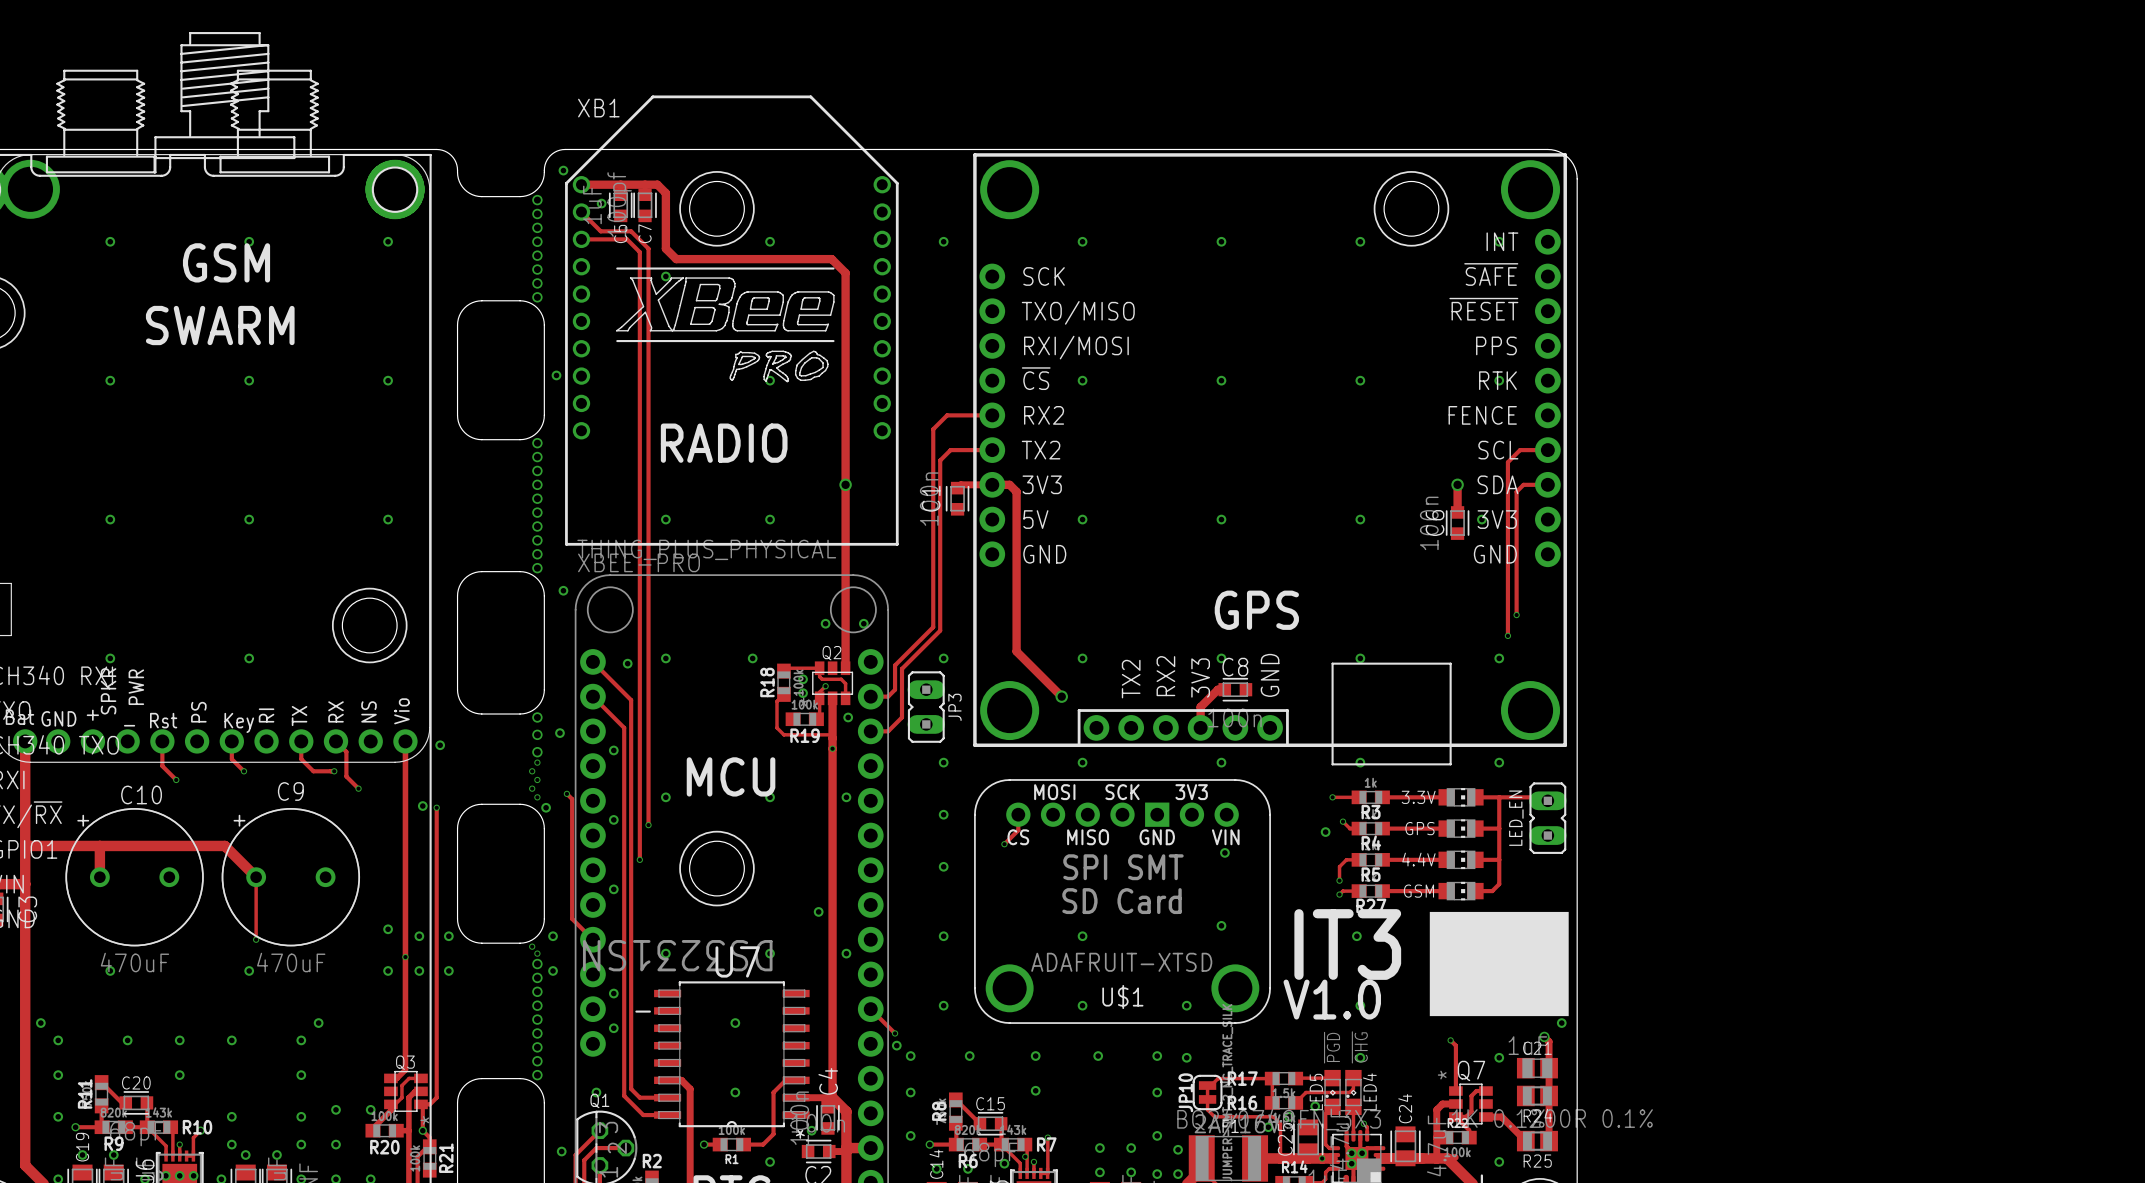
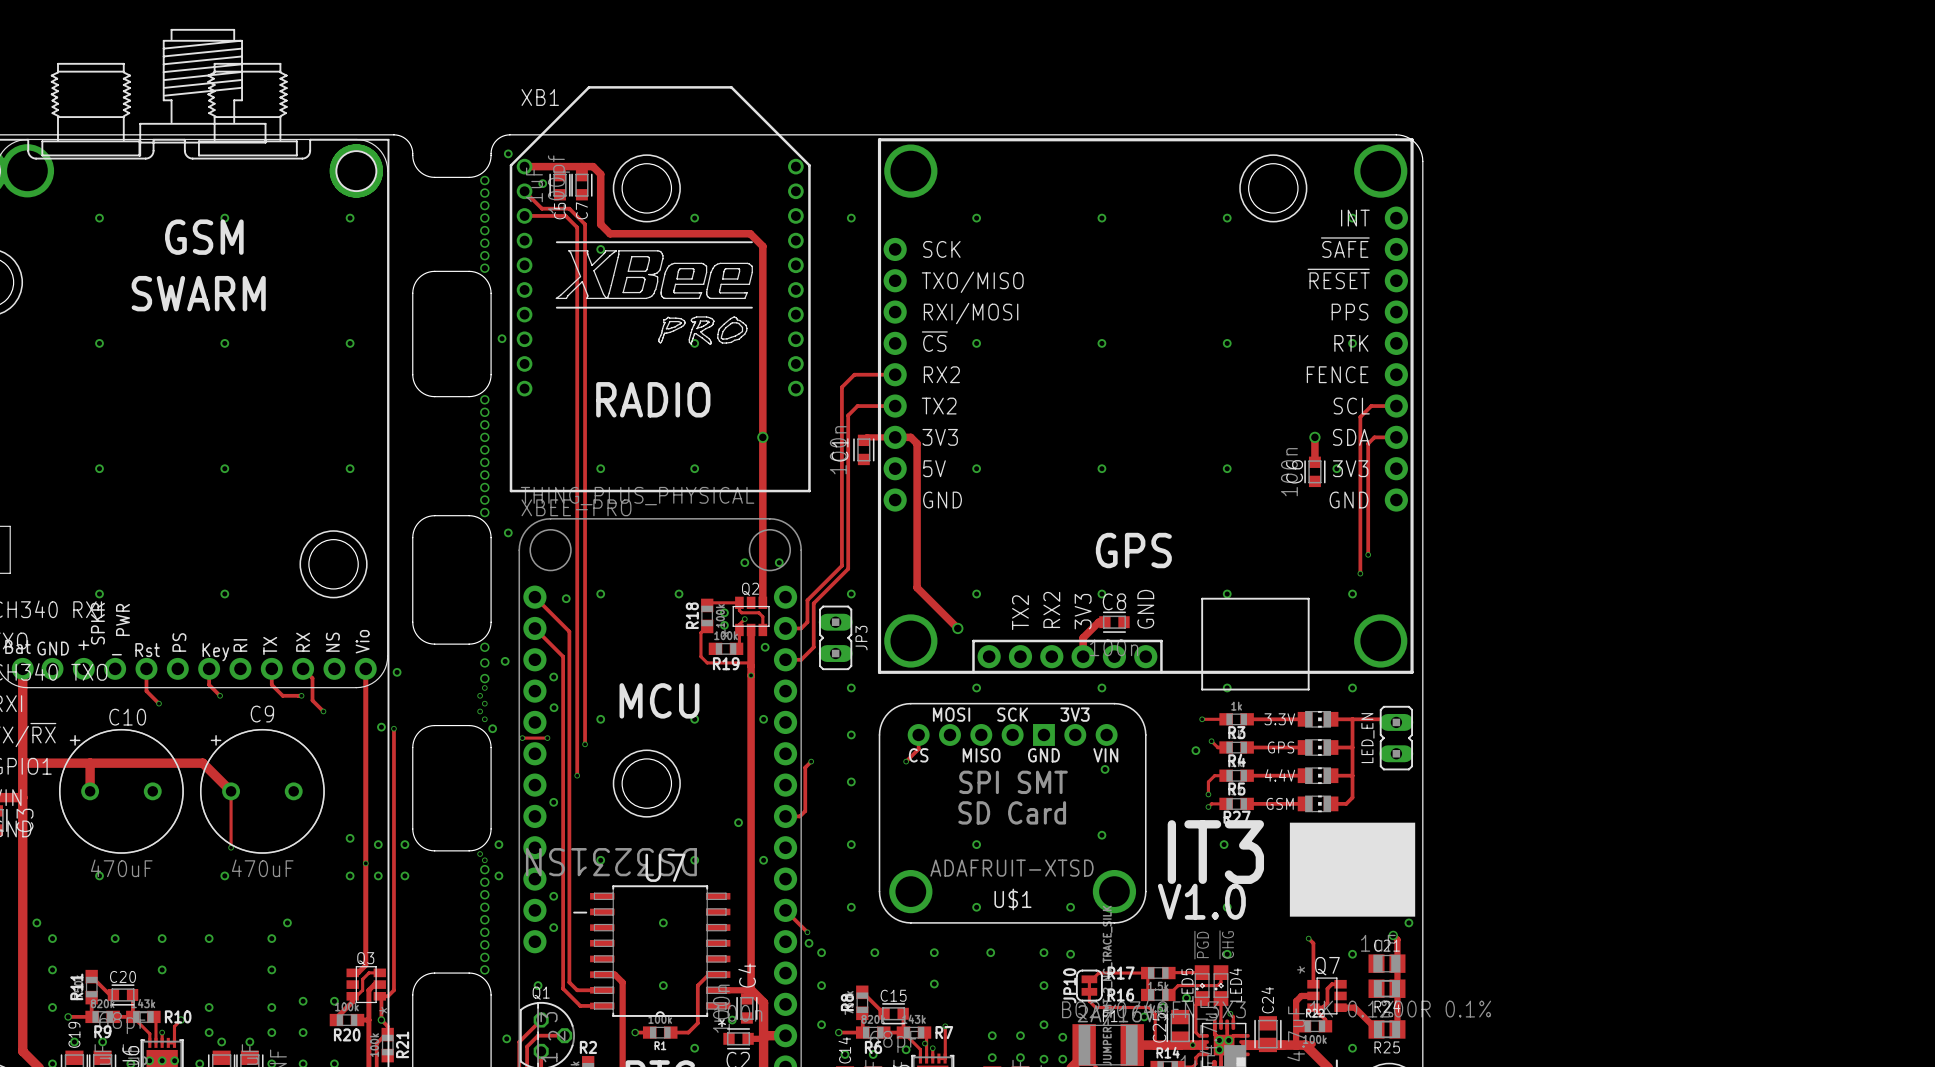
track: (566, 793) (572, 799) (572, 918) (592, 939) -> none
via: (566, 793) -> none
track: none -> (522, 738) (547, 738)
via: none -> (522, 738)
via: none -> (547, 738)
via position: (613, 819) -> (554, 707)
track: none -> (811, 761) (805, 767) (805, 811) (799, 816) (785, 816)
via: none -> (811, 761)

